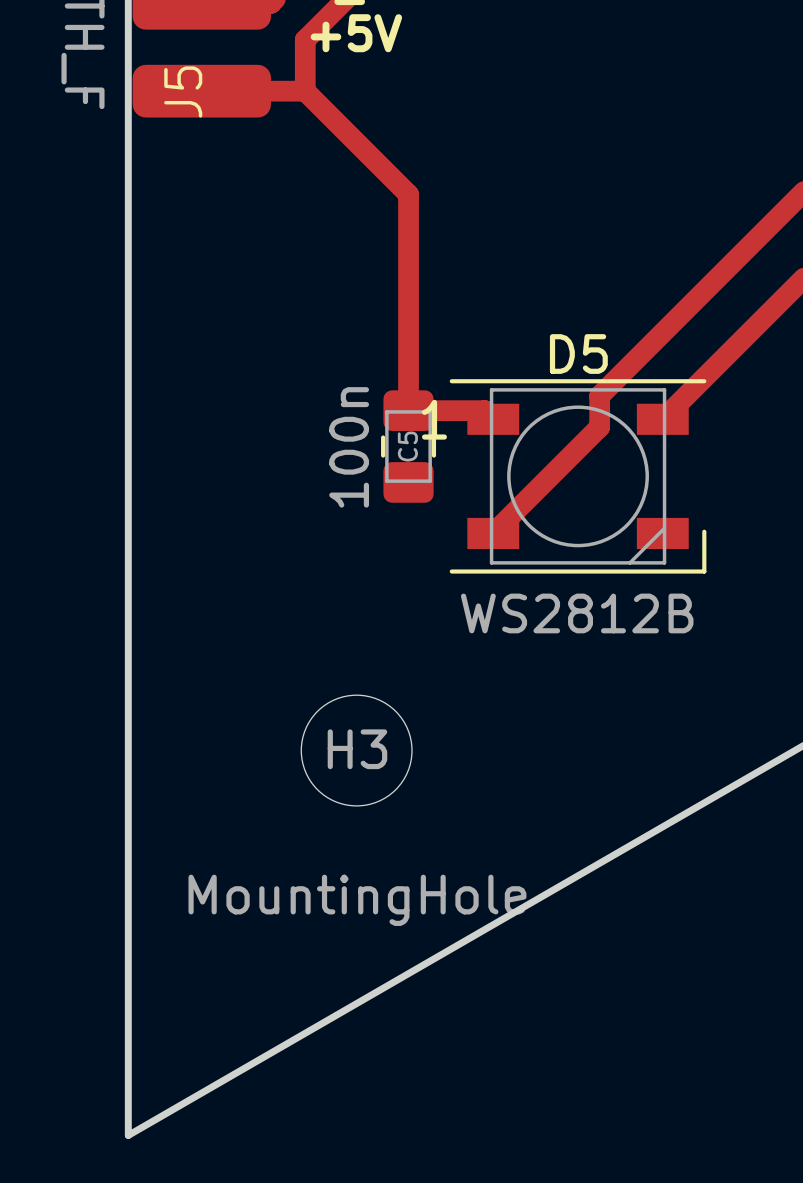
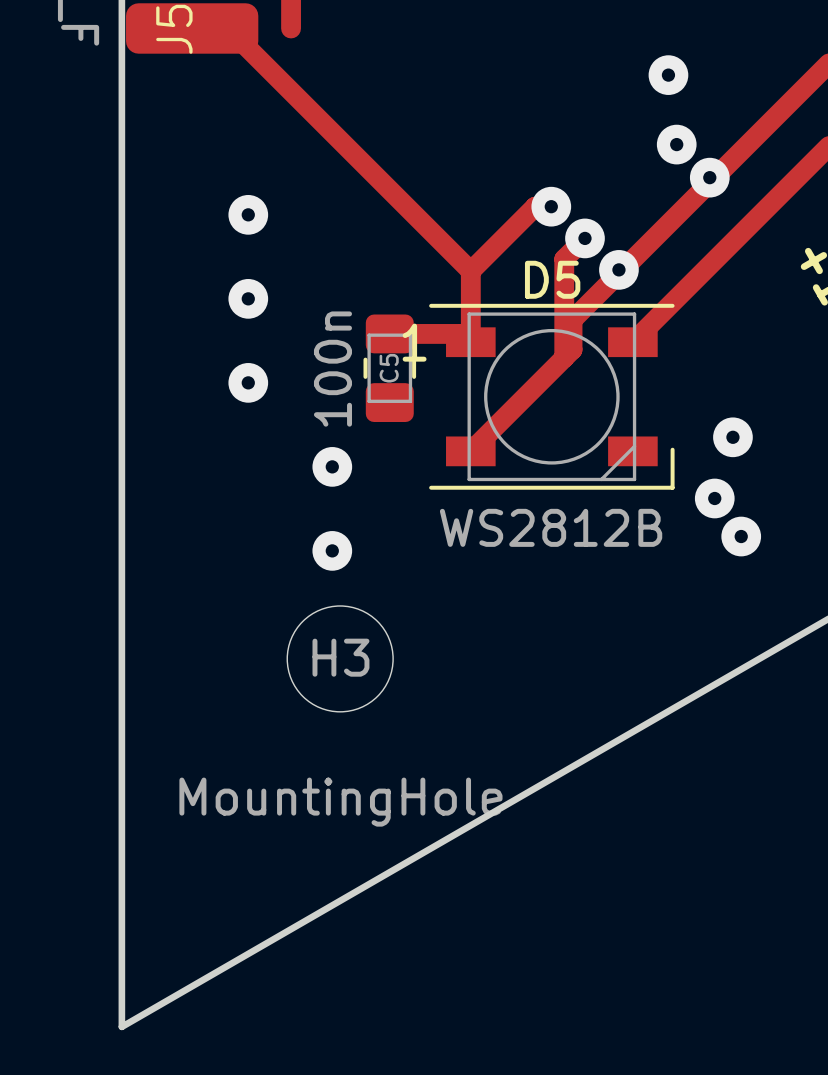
track: (239, 91) (305, 91) (408, 194) (408, 410) -> (228, 28) (470, 271)
via: none -> (668, 75)
via: none -> (676, 144)
via: none -> (709, 177)
track: none -> (551, 206) (535, 206) (470, 271)
via: none -> (551, 206)
via: none -> (248, 214)
track: none -> (584, 238) (564, 259) (564, 357)
via: none -> (584, 238)
via: none -> (618, 269)
track: none -> (470, 271) (470, 342)
via: none -> (248, 298)
via: none -> (248, 382)
via: none -> (732, 437)
via: none -> (332, 466)
via: none -> (714, 498)
via: none -> (741, 536)
via: none -> (332, 550)

